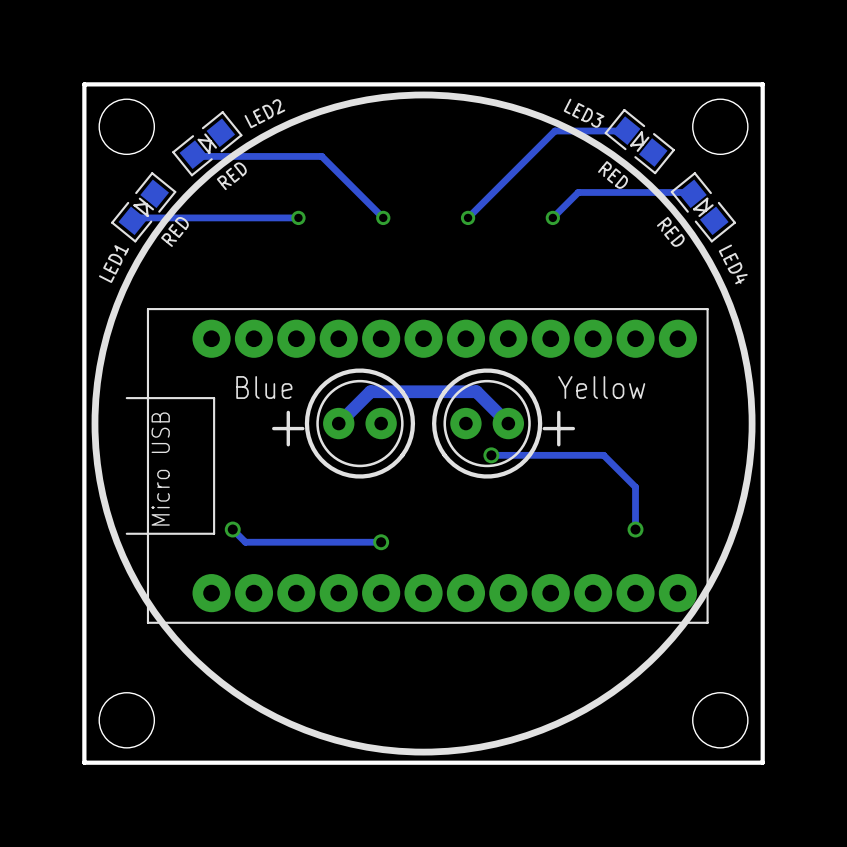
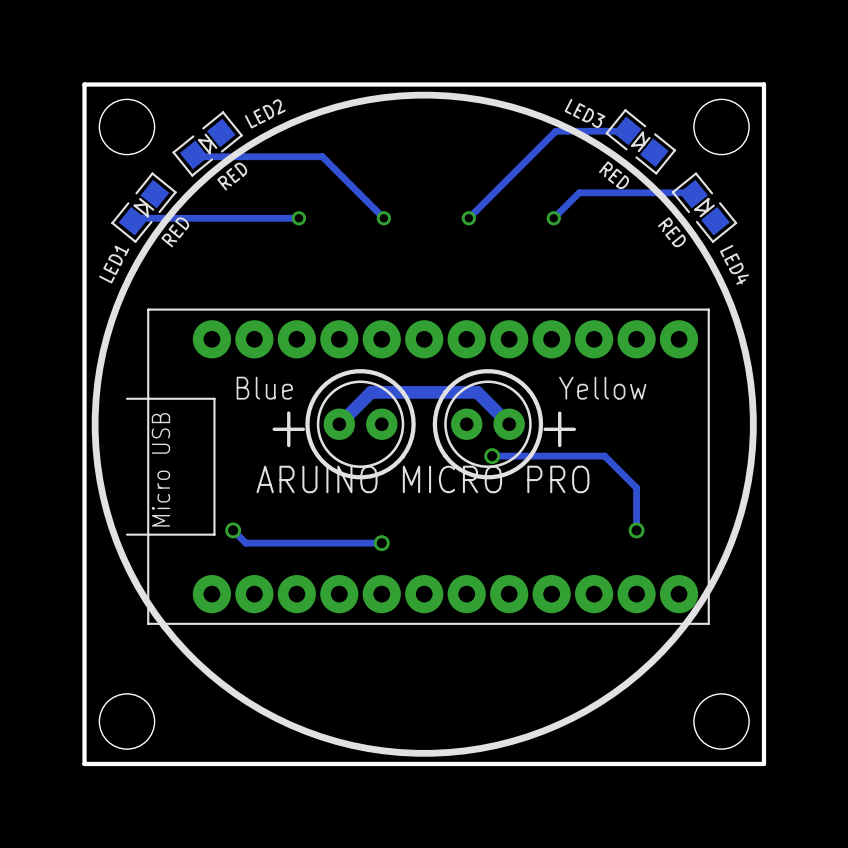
part text: none -> ARUINO MICRO PRO (422, 479)

